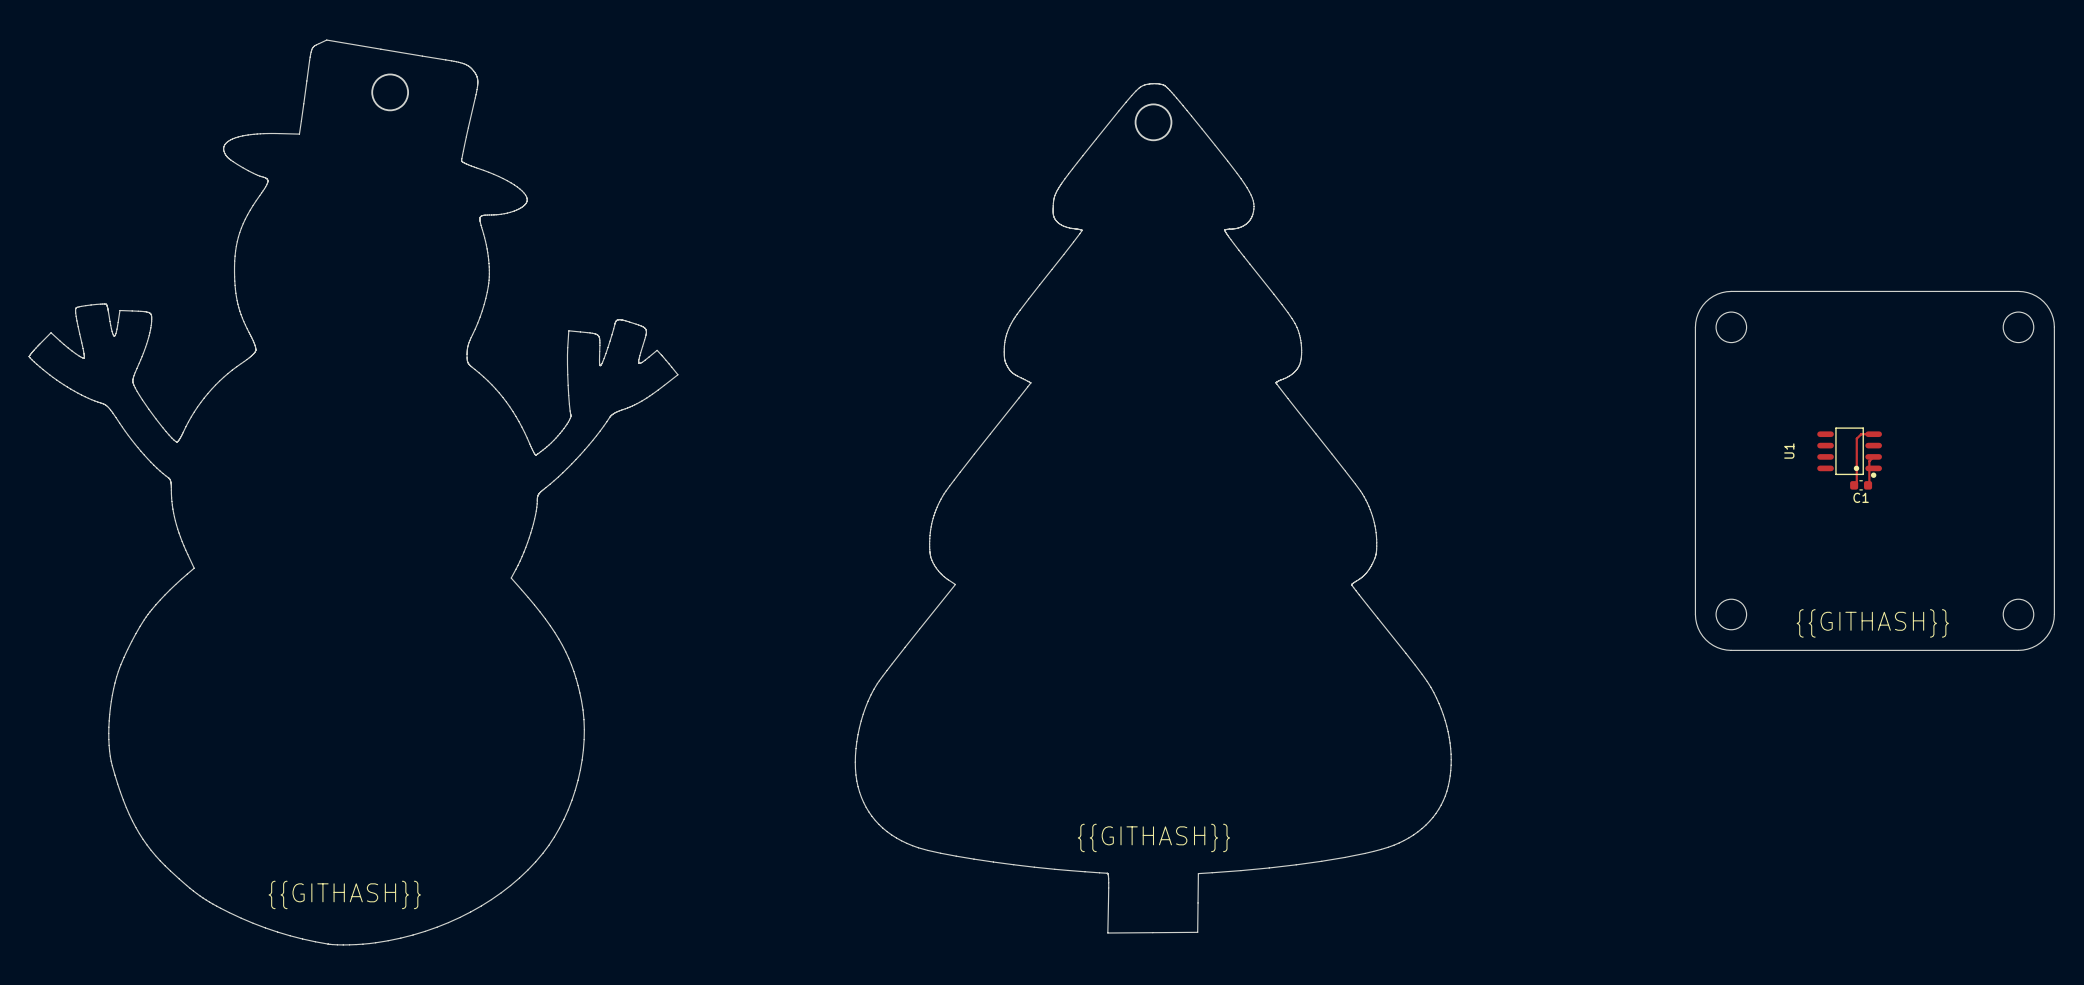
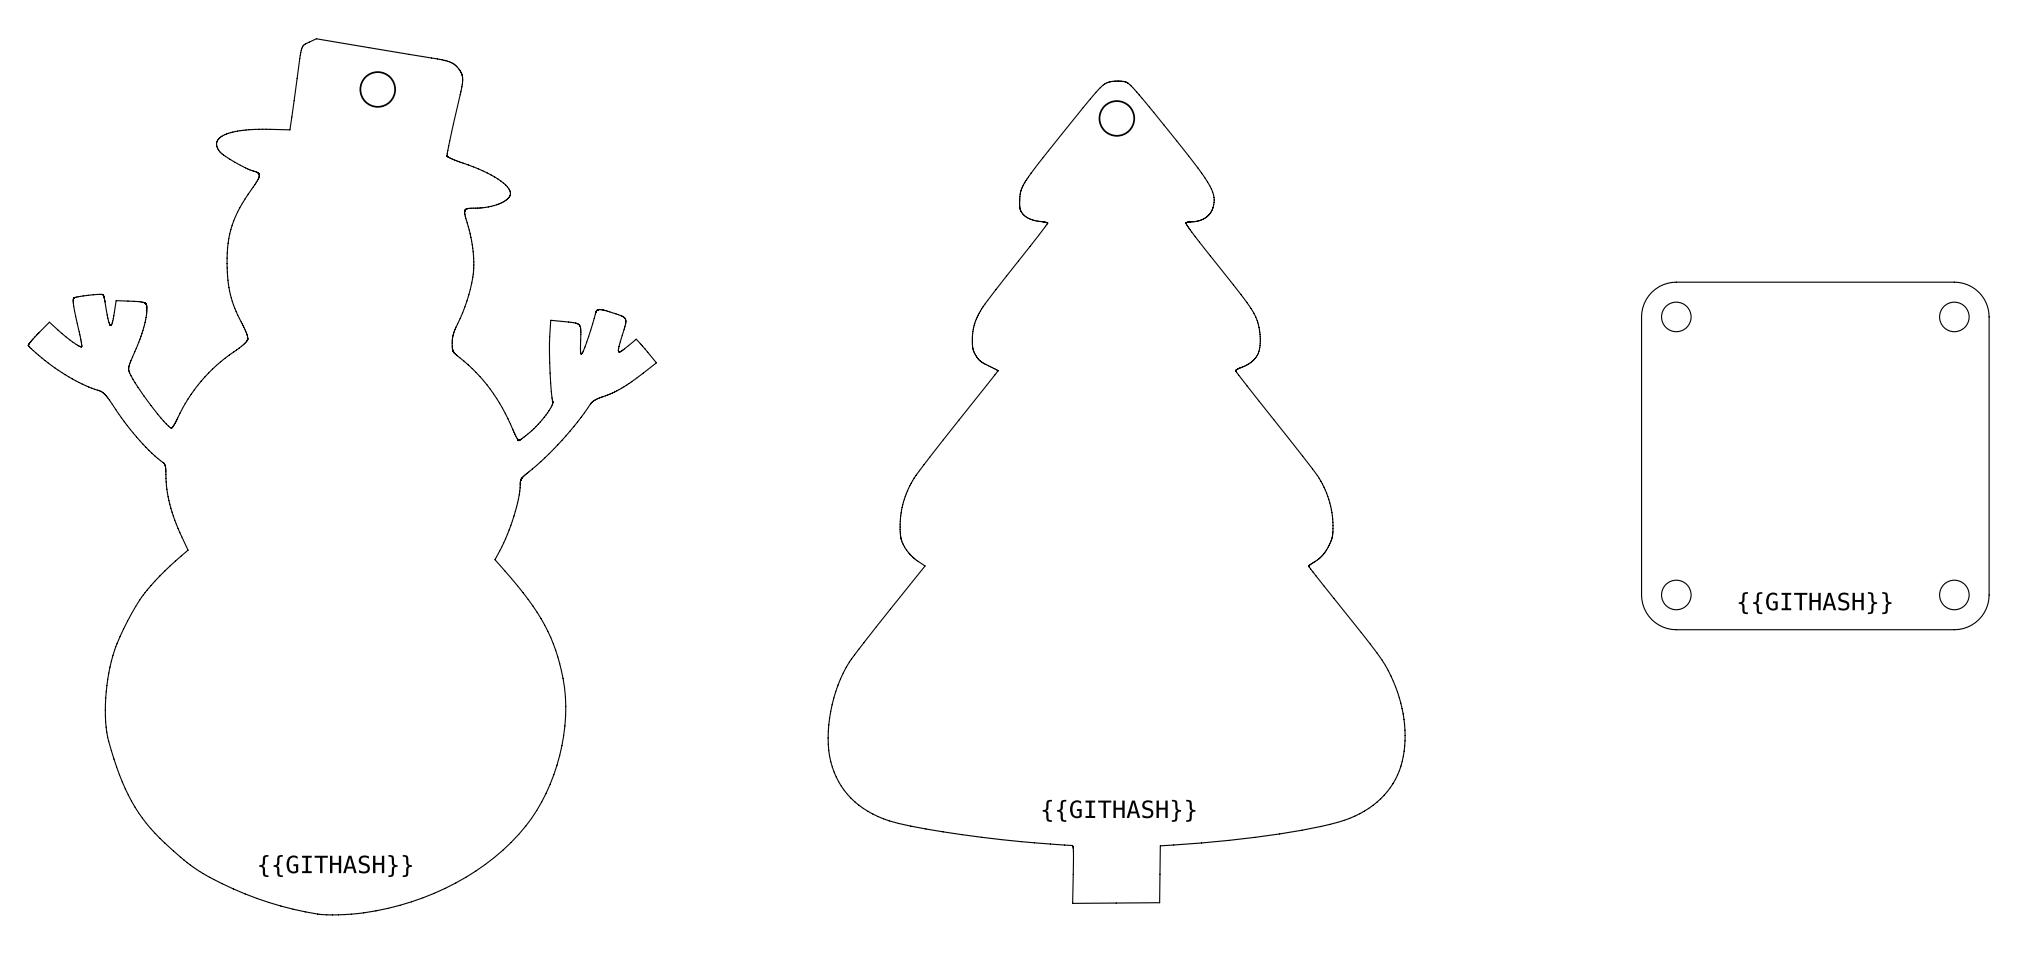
top track: (1873, 434) (1861, 434) (1856, 438) (1856, 482) (1854, 485) -> none
U1: (1849, 452) -> none
top track: (1873, 456) (1869, 461) (1868, 485) -> none
C1: (1861, 485) -> none

